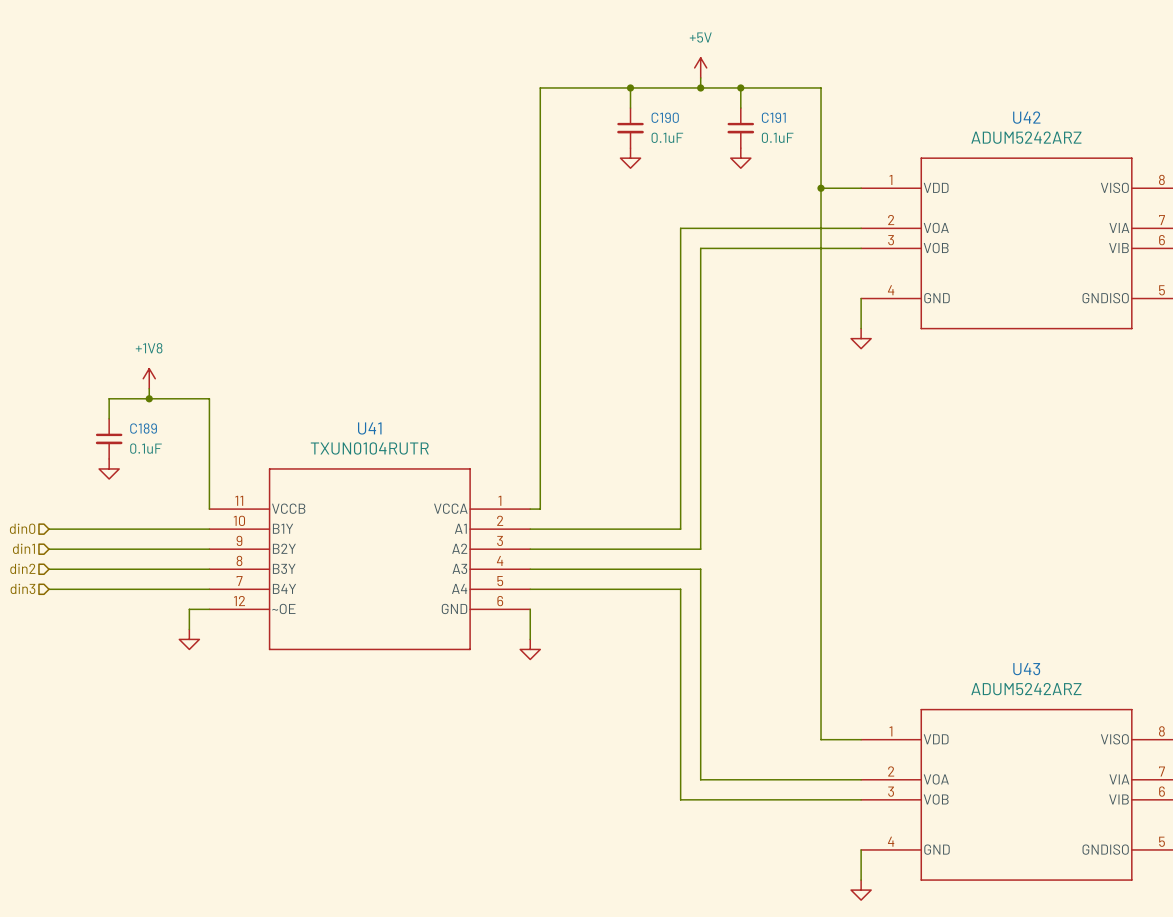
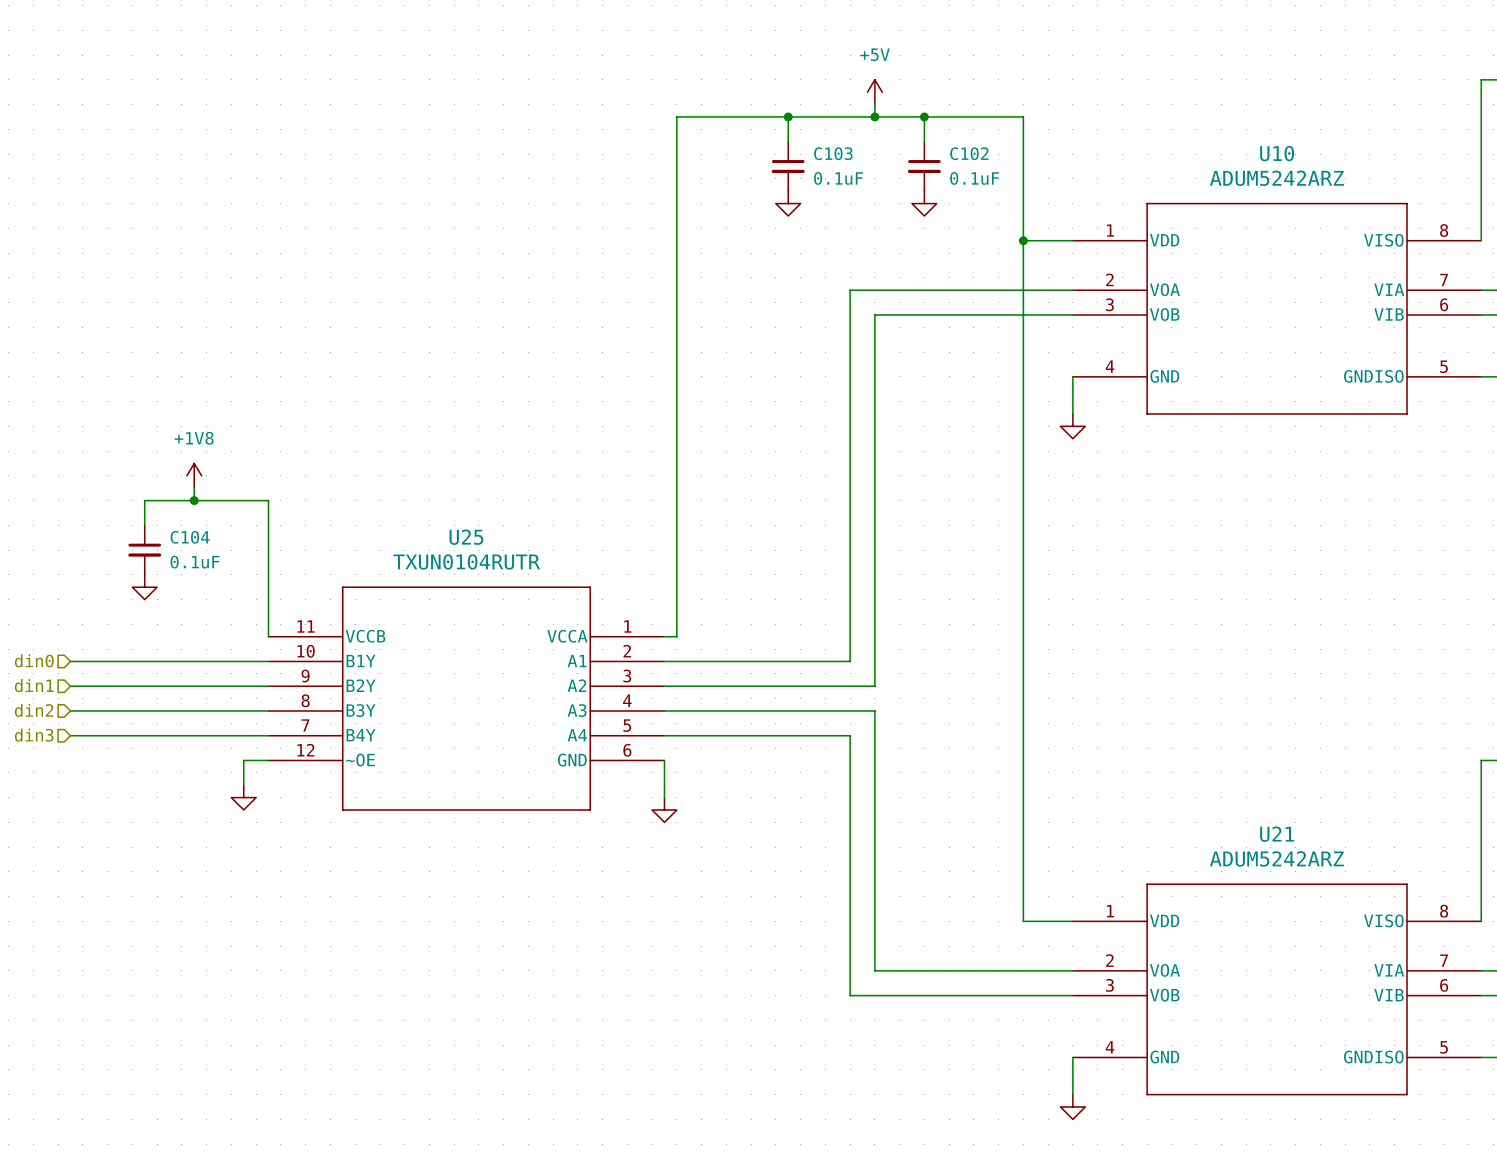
C190 name: C190 (665, 117) -> C103 (833, 153)
C191 name: C191 (773, 117) -> C102 (969, 153)
U42 name: U42 (1026, 117) -> U10 (1277, 153)
C189 name: C189 (143, 428) -> C104 (190, 537)
U41 name: U41 (369, 428) -> U25 (466, 537)
U43 name: U43 (1026, 669) -> U21 (1277, 834)

